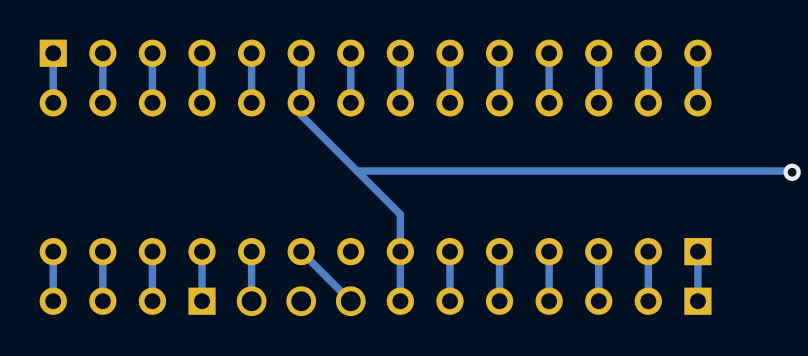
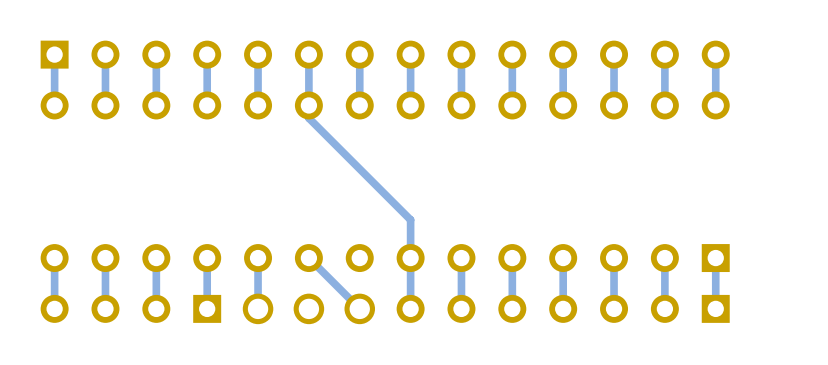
track: (356, 171) (792, 172) -> none
via: (792, 172) -> none

